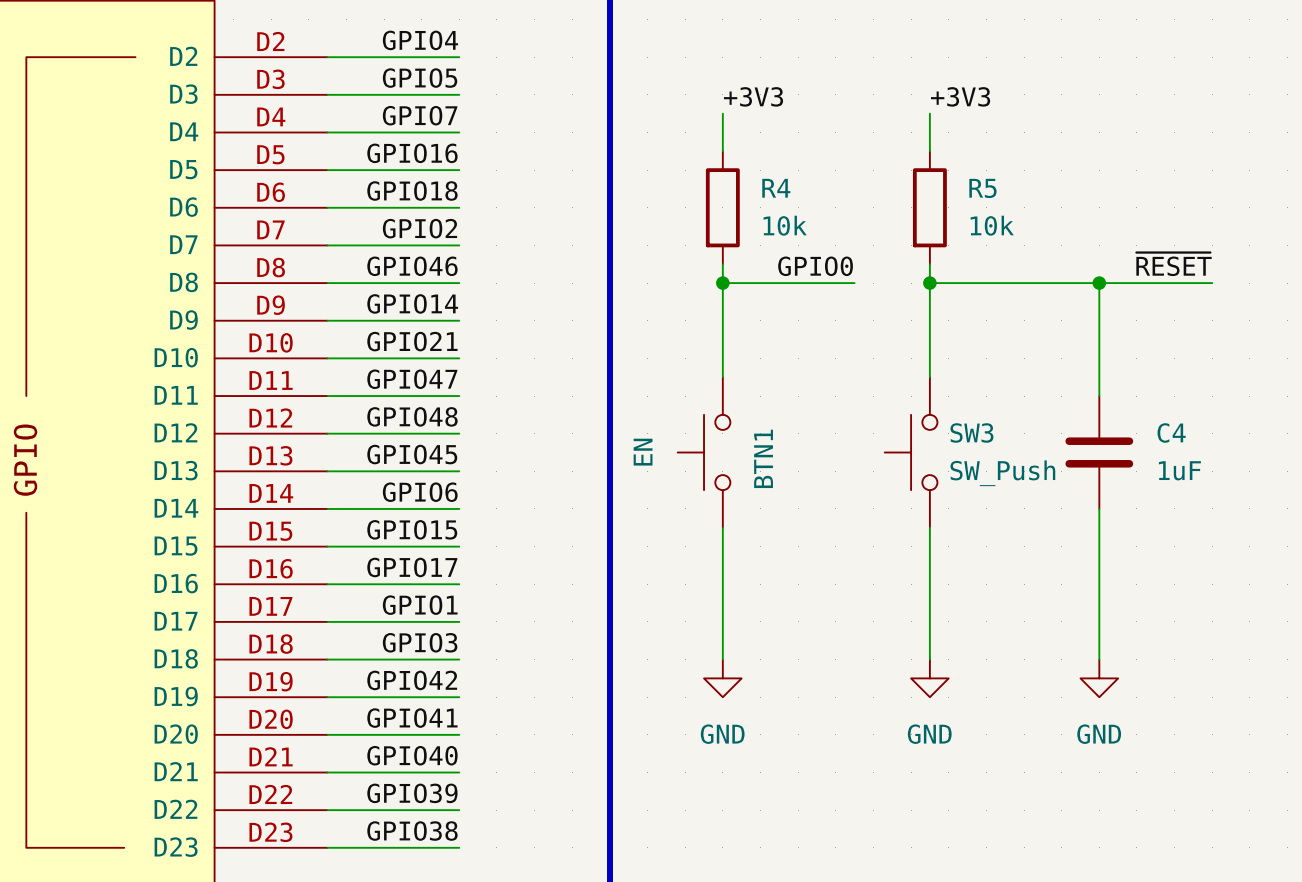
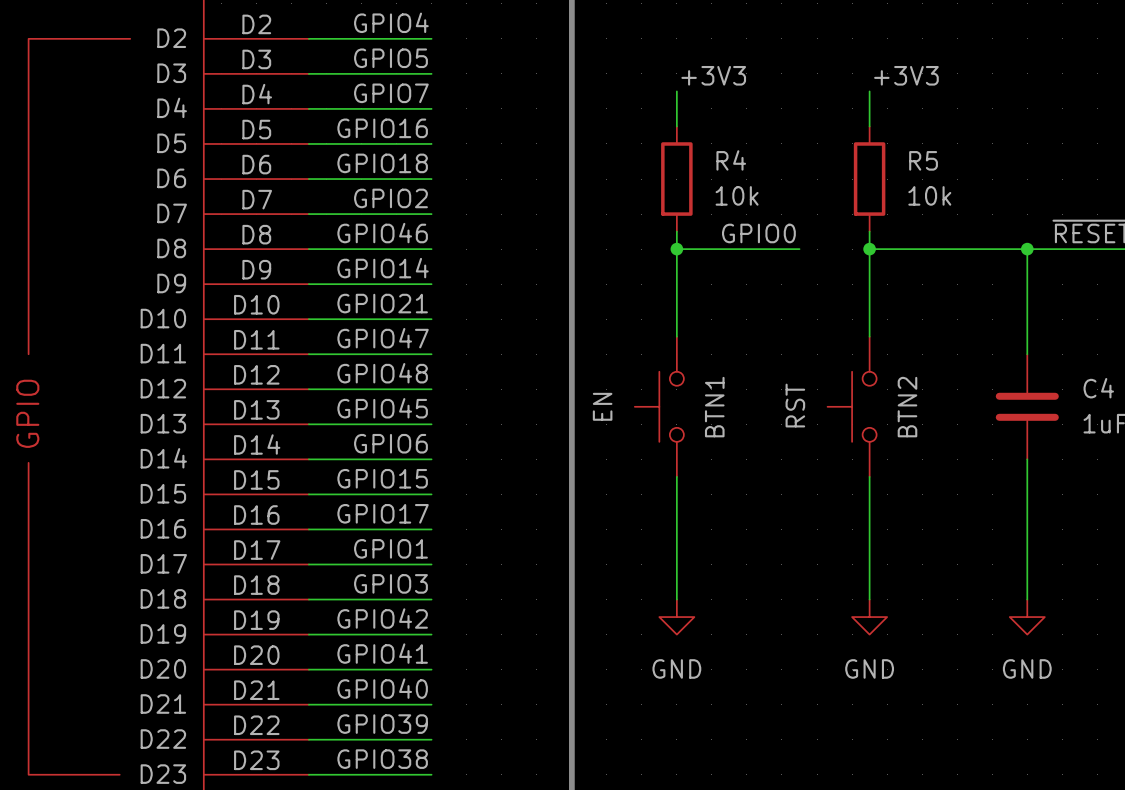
SW3 name: SW3 (971, 432) -> BTN2 (907, 407)
SW3 value: SW_Push (1002, 473) -> RST (795, 405)

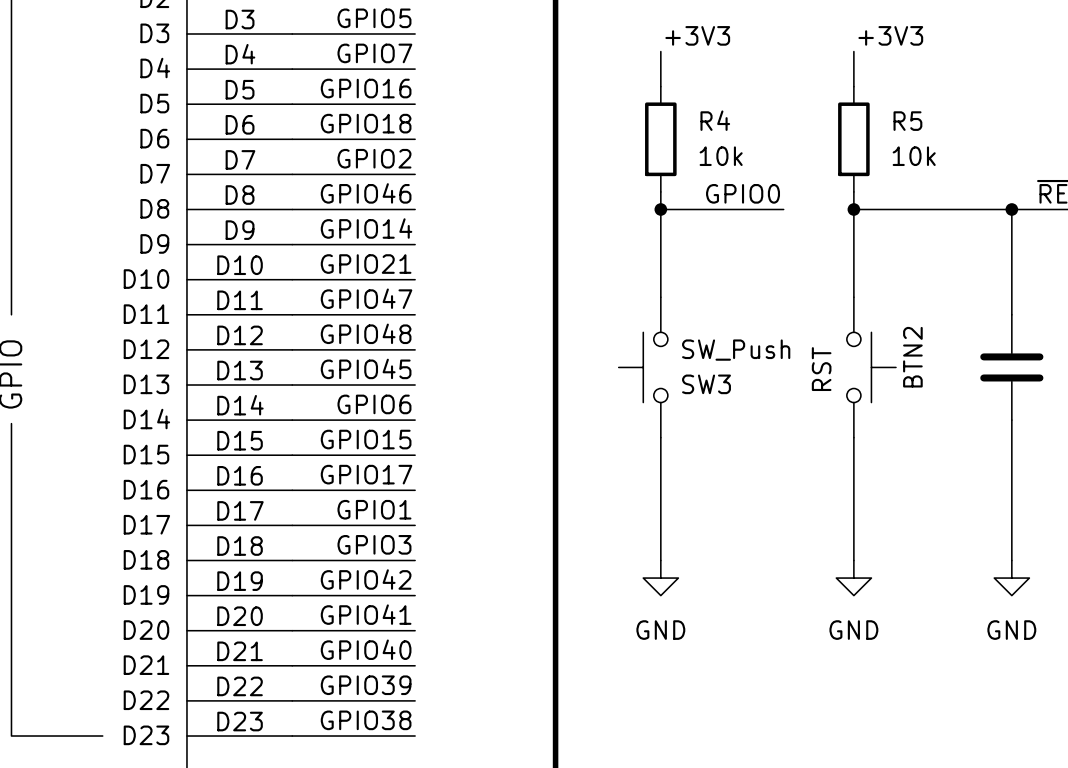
BTN1 value: EN (602, 406) -> SW_Push (736, 350)
BTN2 rotation: 0° (852, 406) -> 180° (871, 367)
BTN1 name: BTN1 (714, 407) -> SW3 (706, 384)

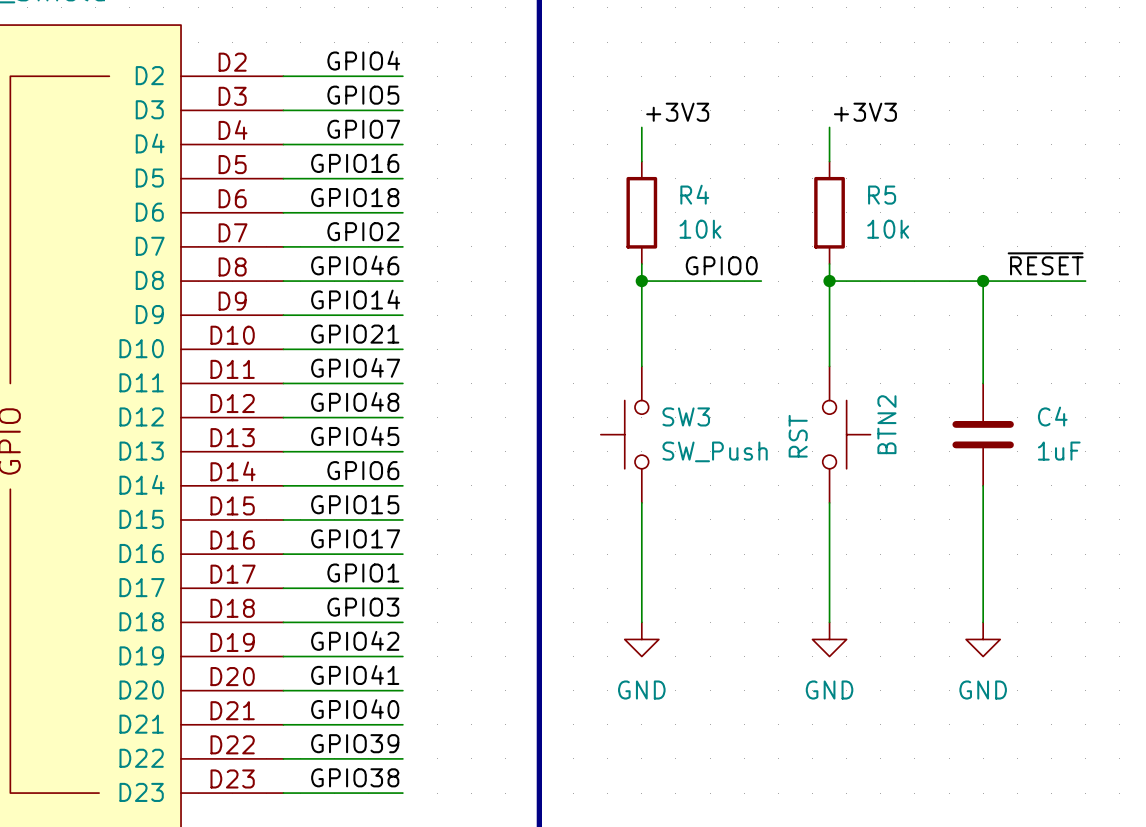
SW3 value position: SW_Push (736, 350) -> SW_Push (715, 451)
SW3 name position: SW3 (706, 384) -> SW3 (686, 416)

